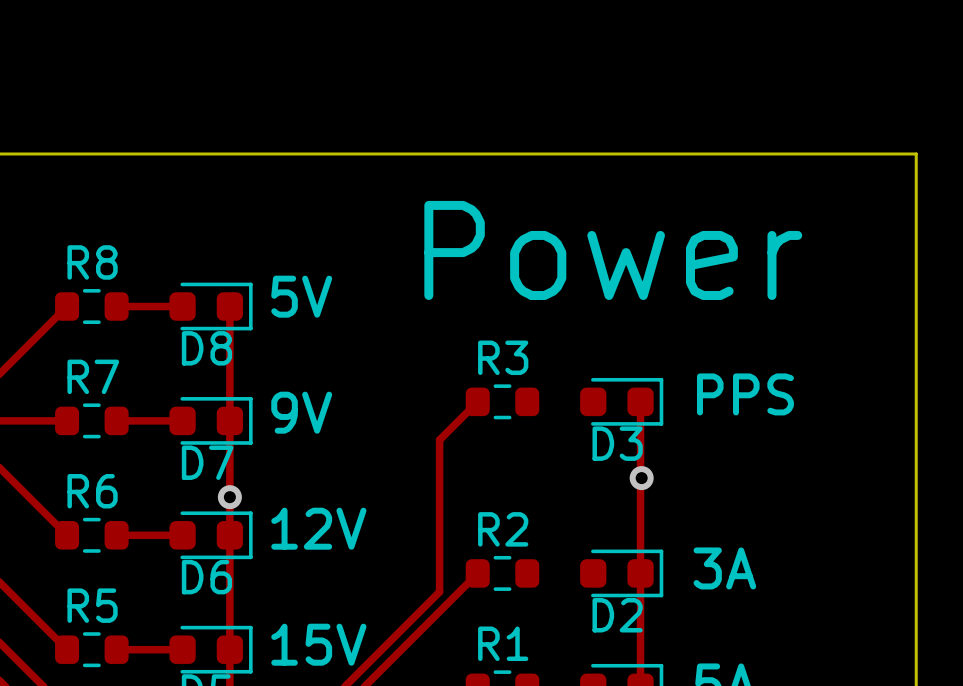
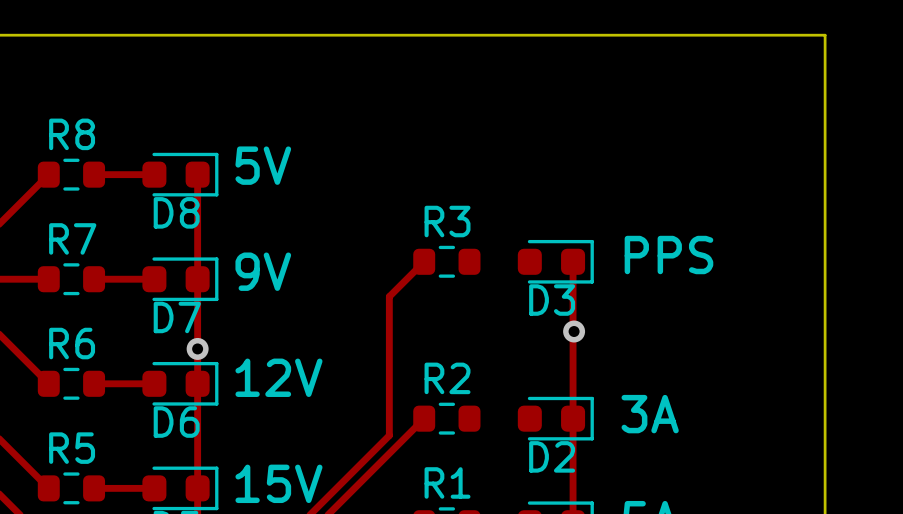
text: Power (613, 250) -> none

